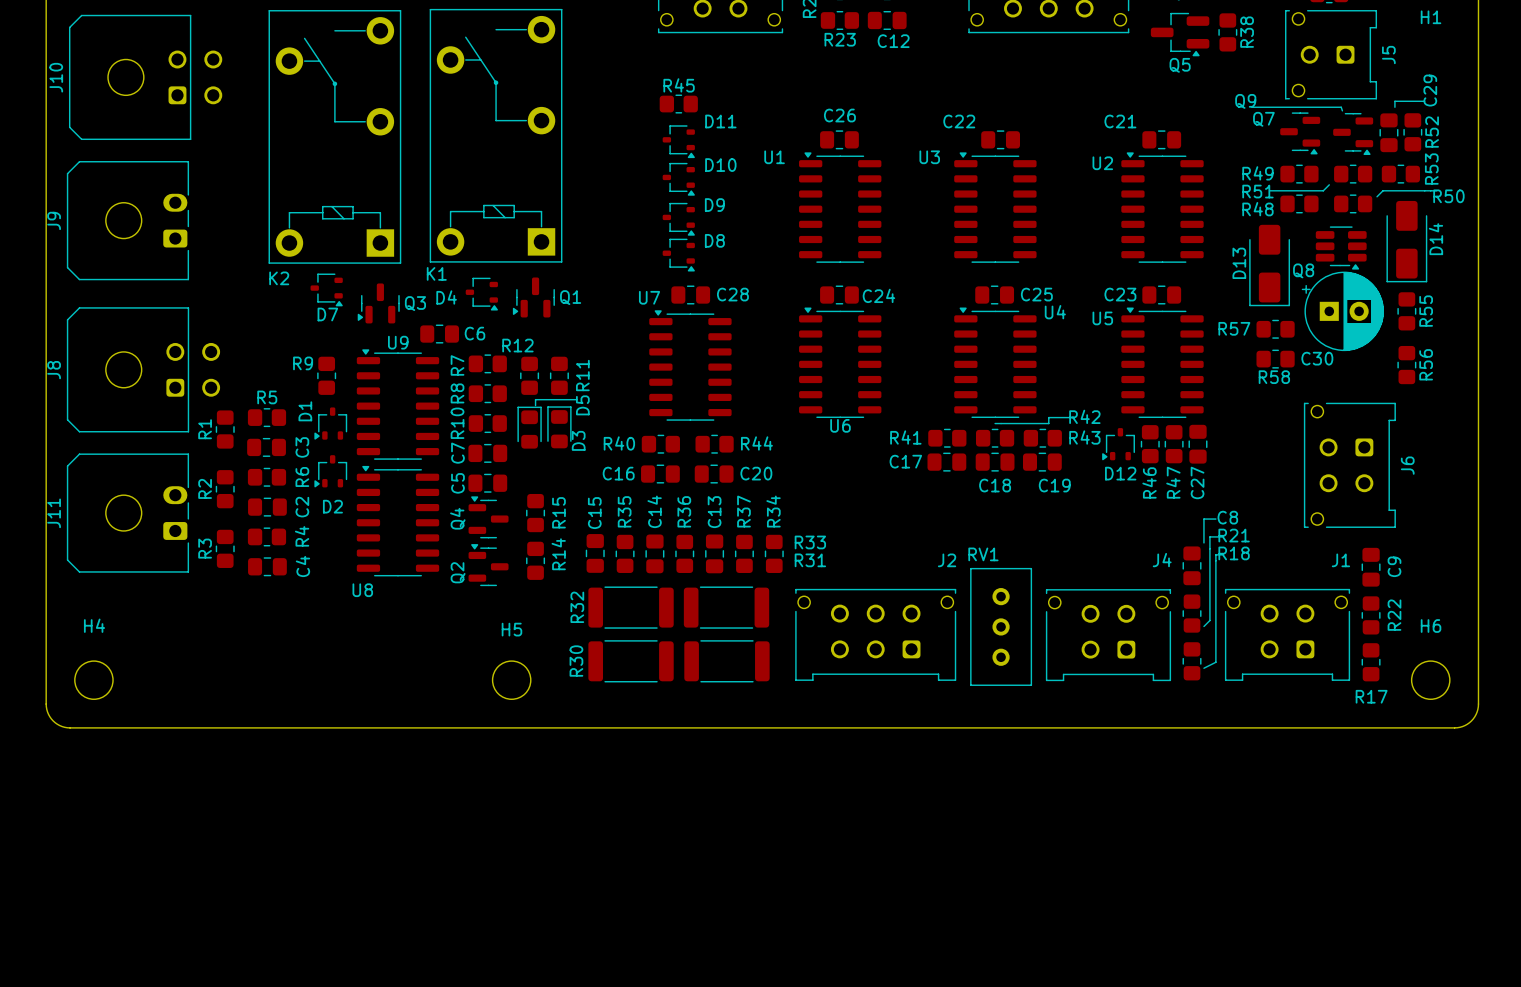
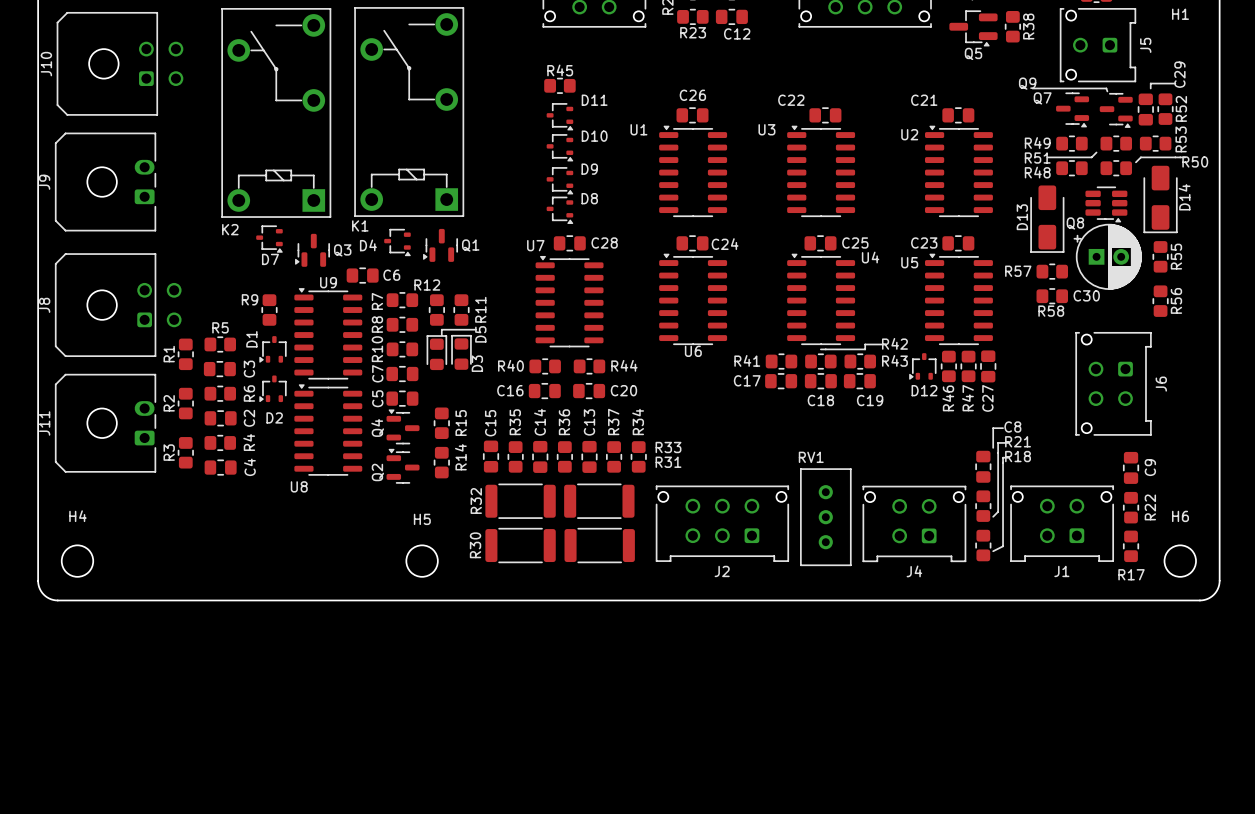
J2 name position: J2 (947, 560) -> J2 (722, 571)
J4 name position: J4 (1162, 560) -> J4 (914, 571)
J1 name position: J1 (1340, 560) -> J1 (1061, 571)

